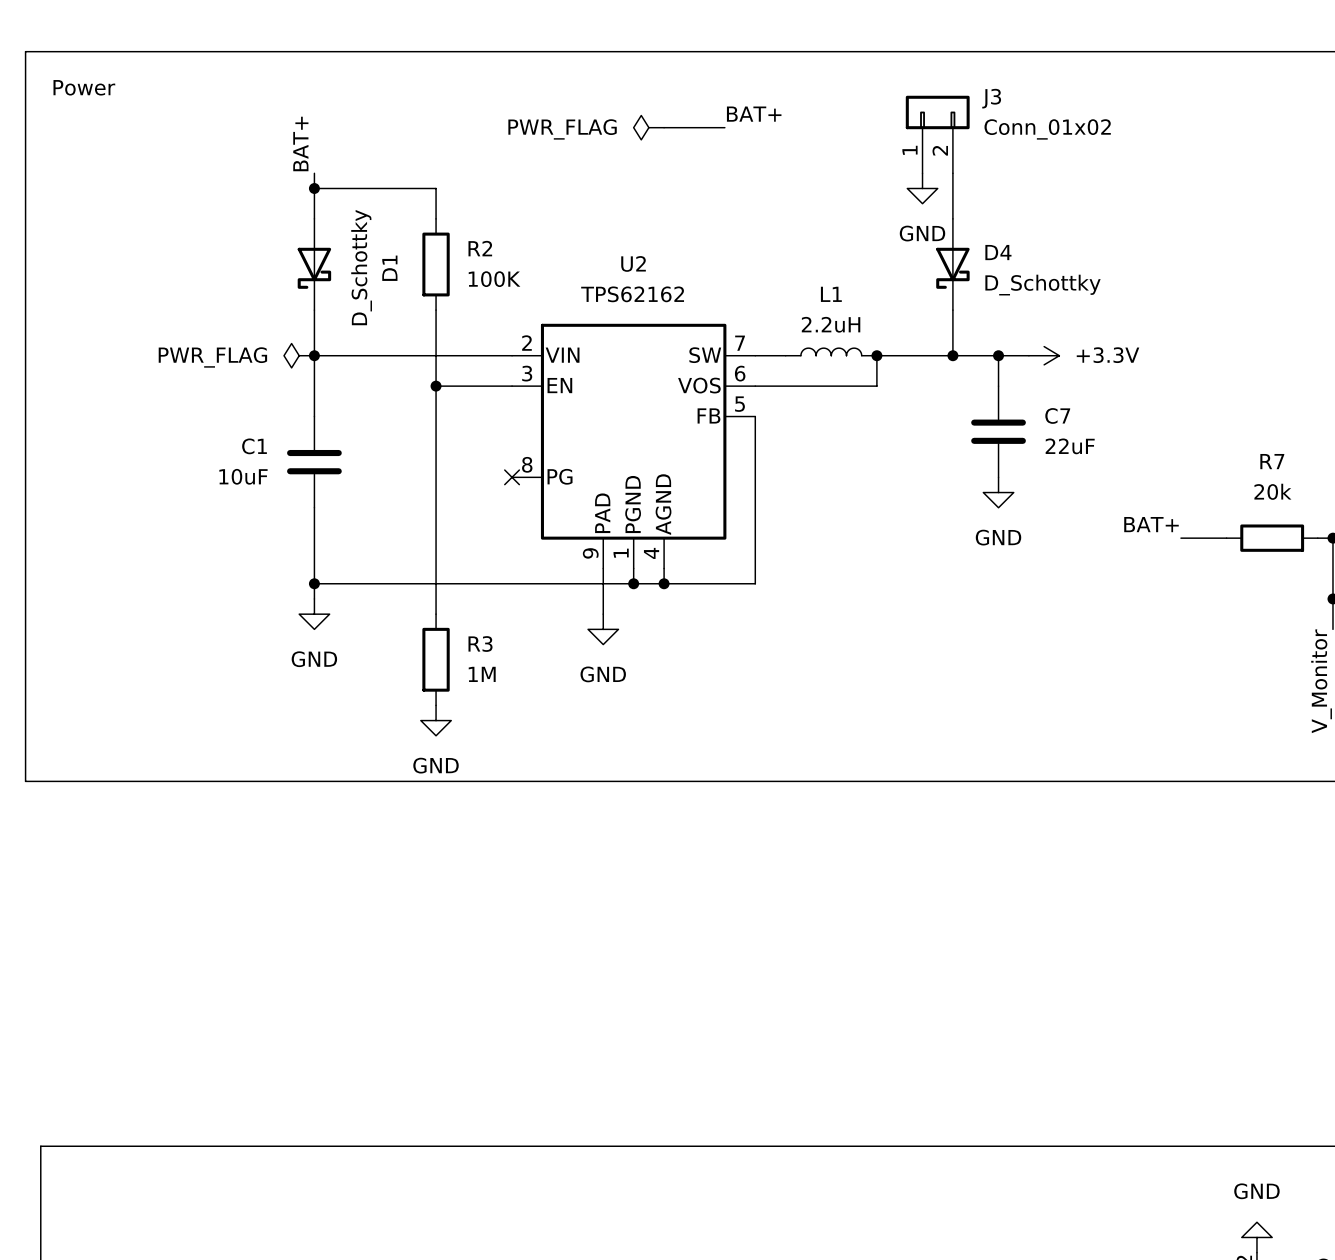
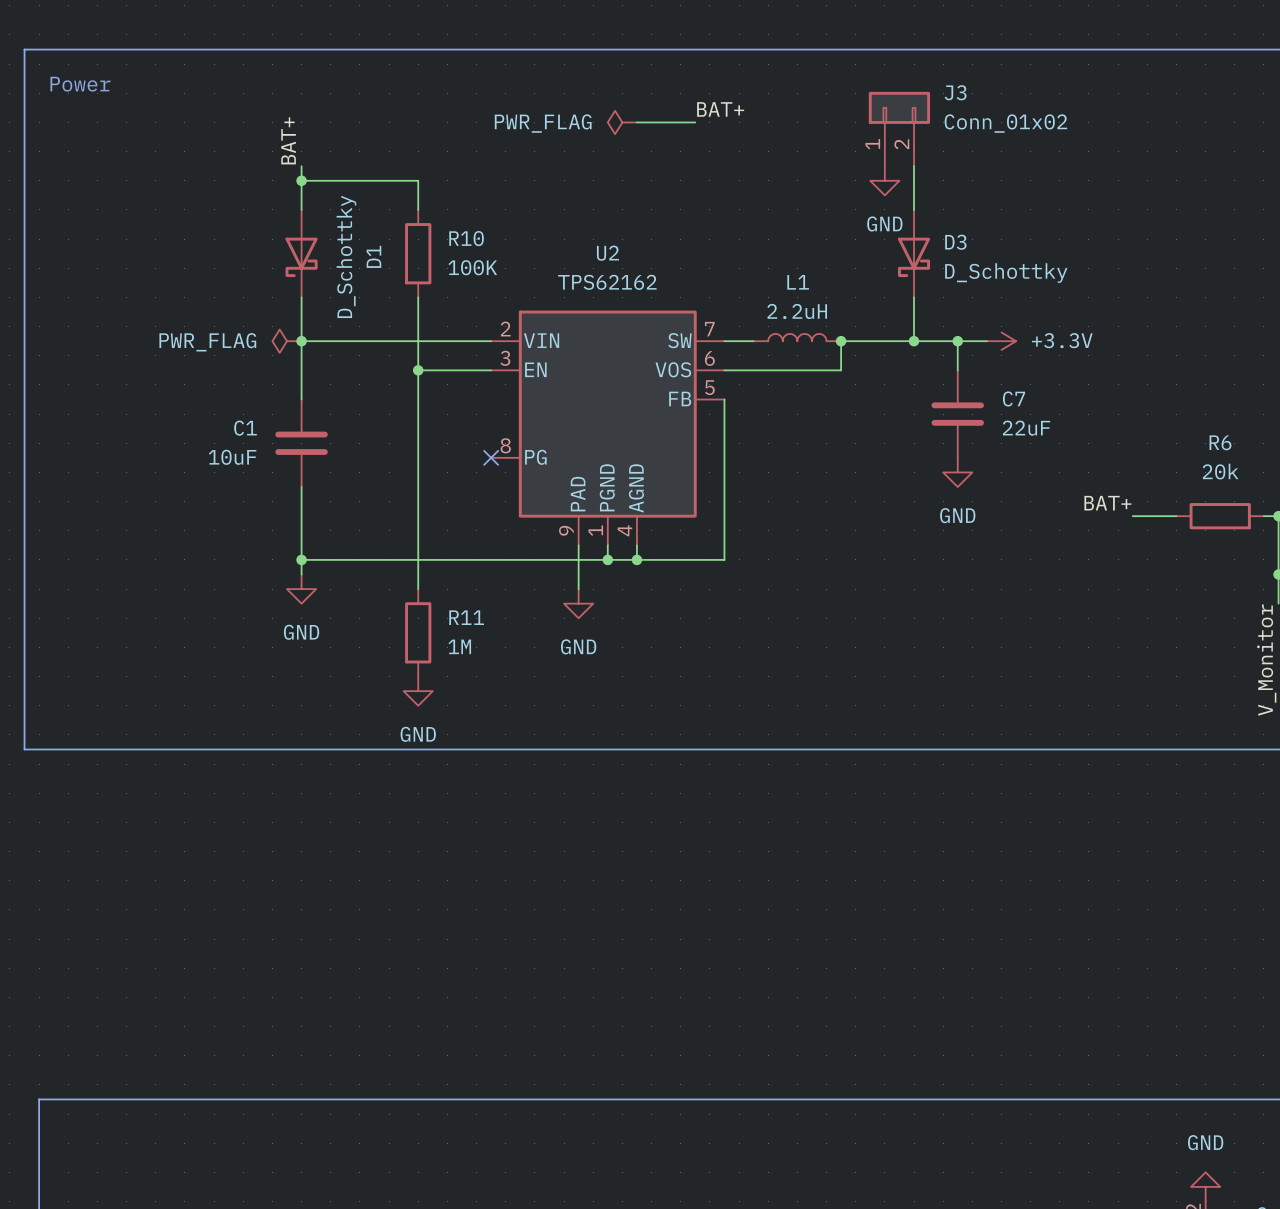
R2 name: R2 (480, 248) -> R10 (466, 238)
D4 name: D4 (998, 252) -> D3 (955, 242)
R7 name: R7 (1272, 461) -> R6 (1220, 442)
R3 name: R3 (480, 644) -> R11 (466, 617)

